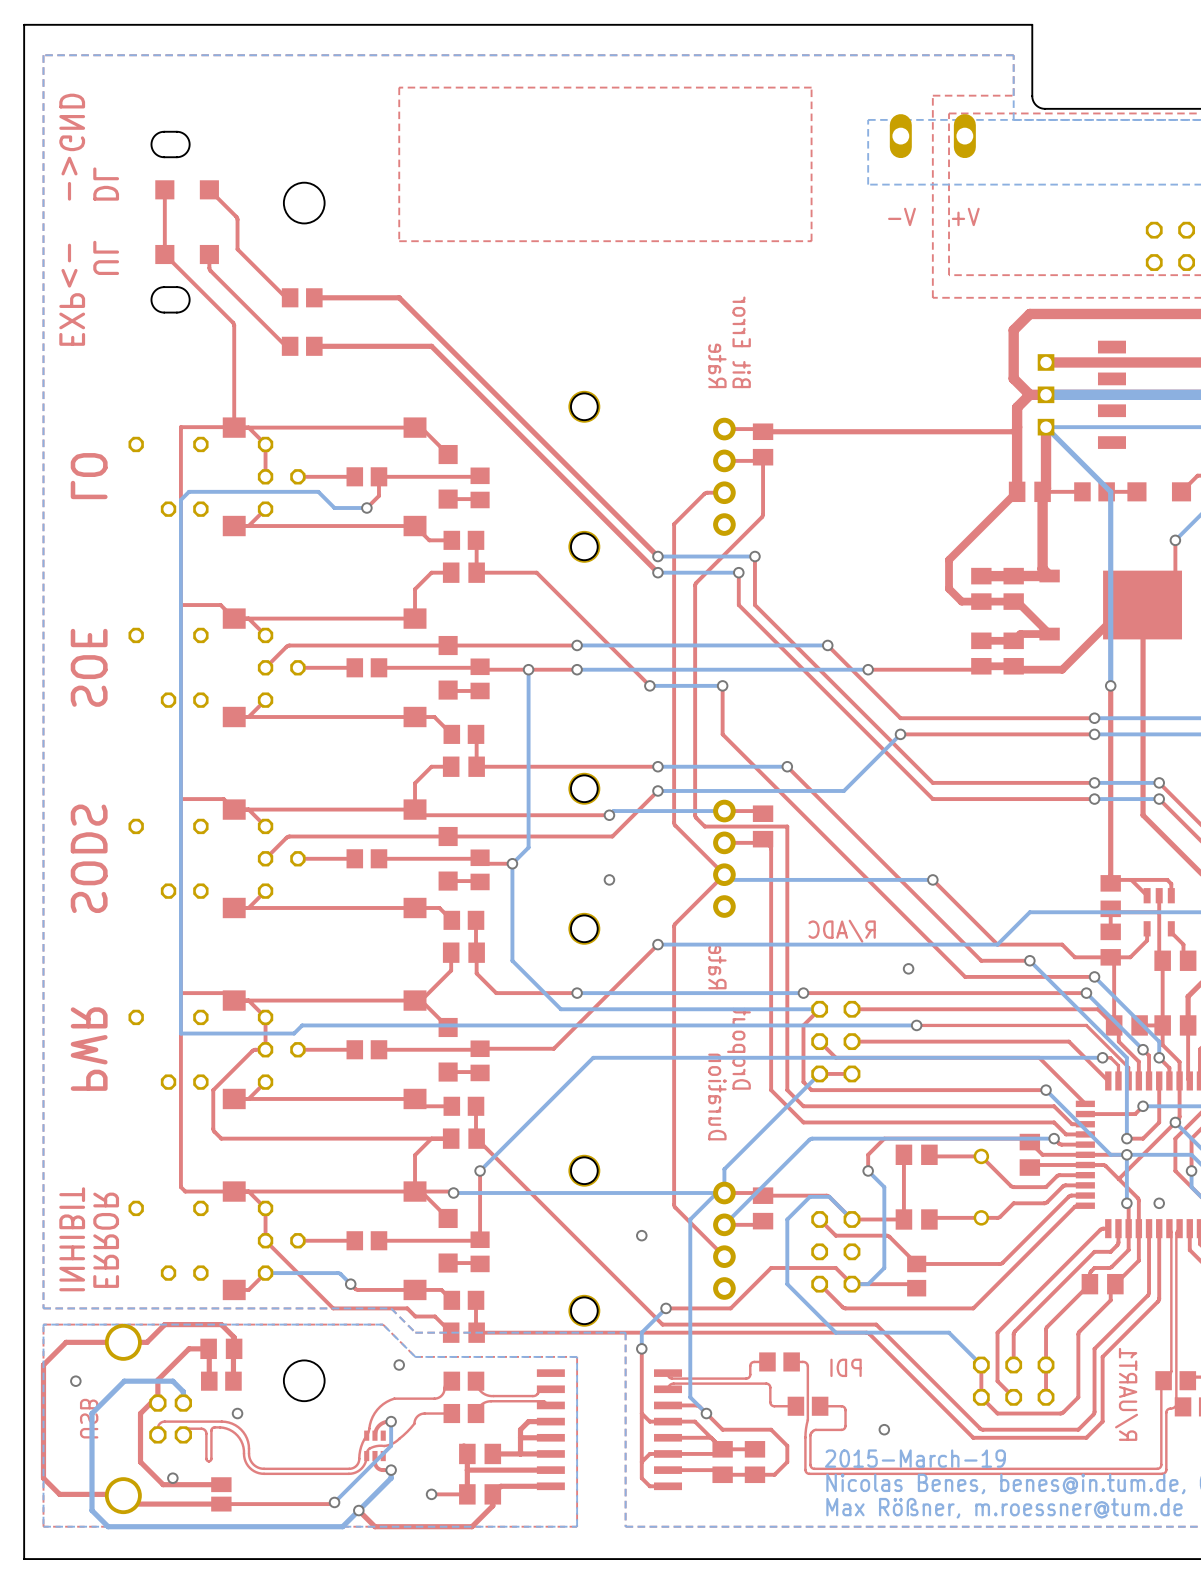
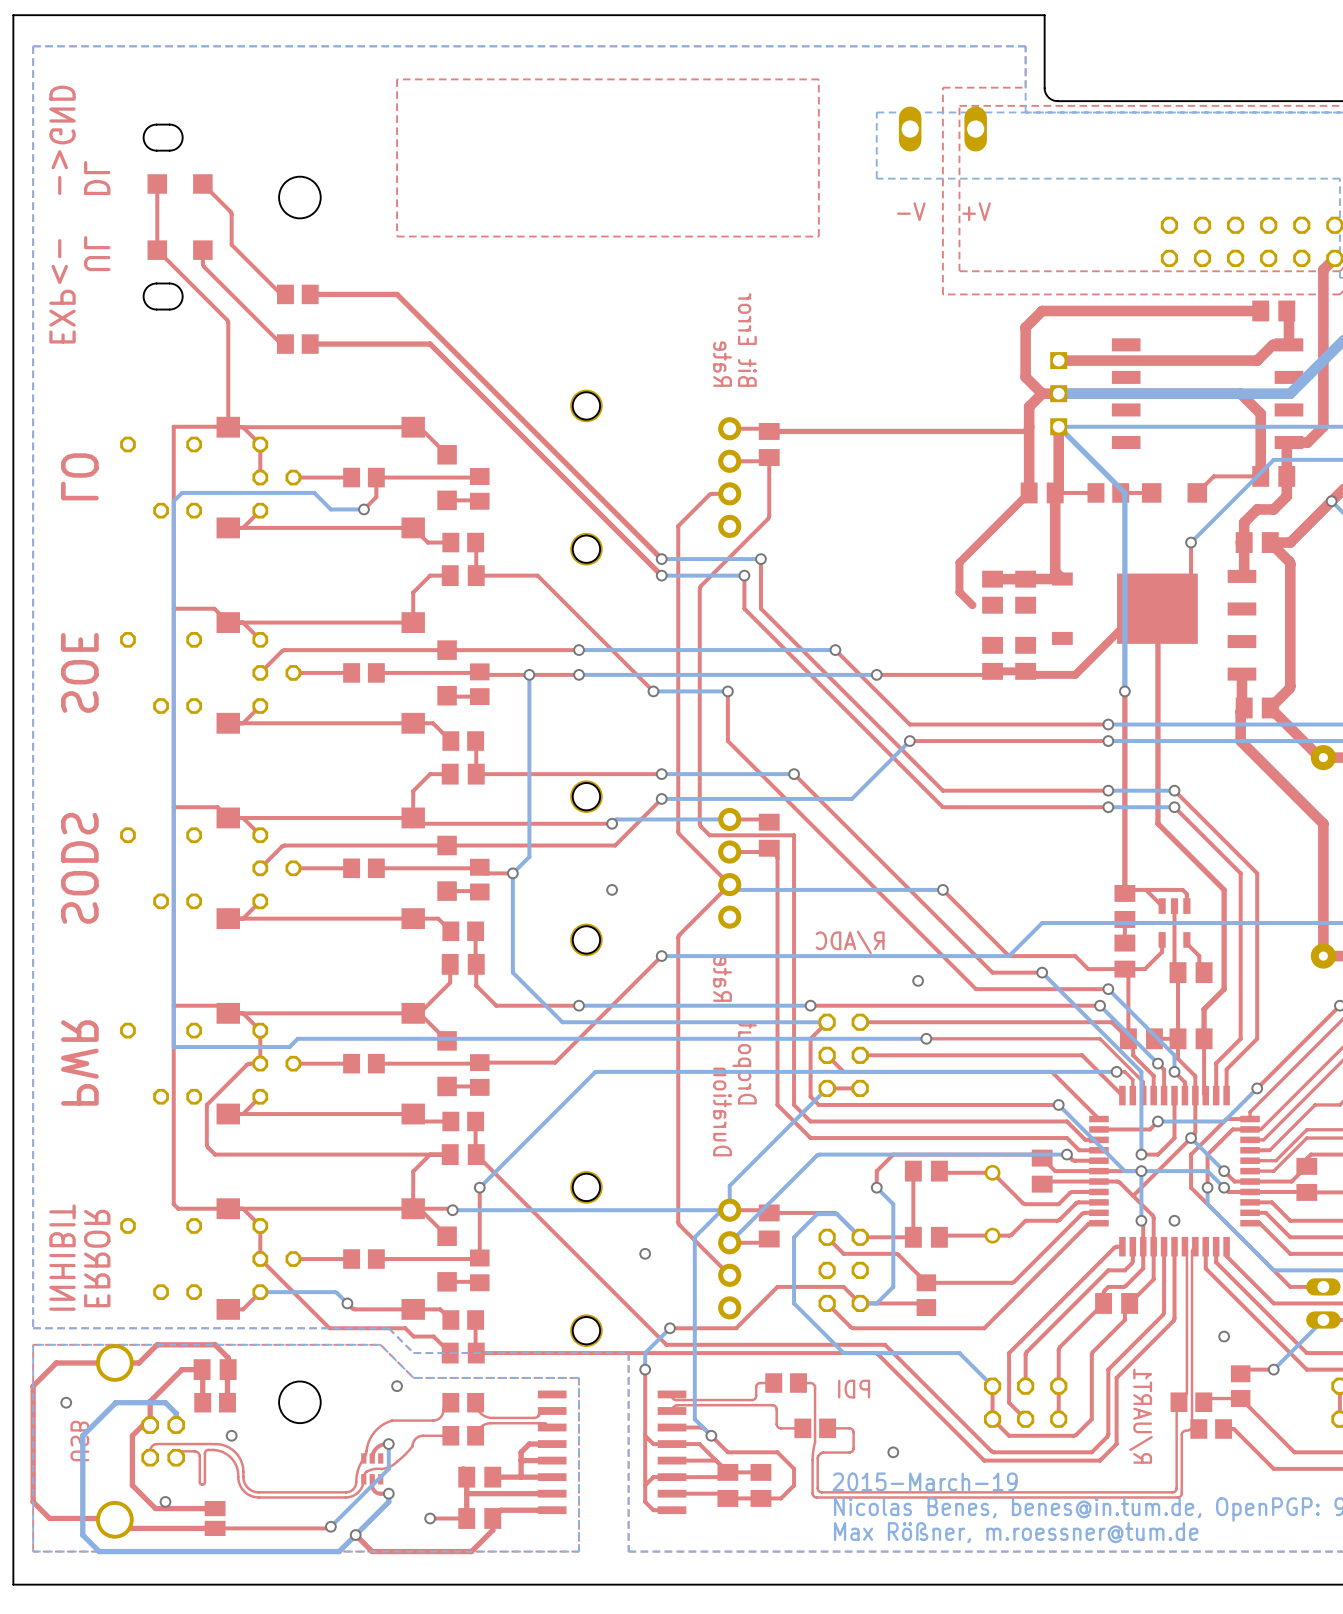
top track: (961, 601) (1017, 601) (1049, 634) (1020, 634) (1013, 640) (981, 640) -> none

